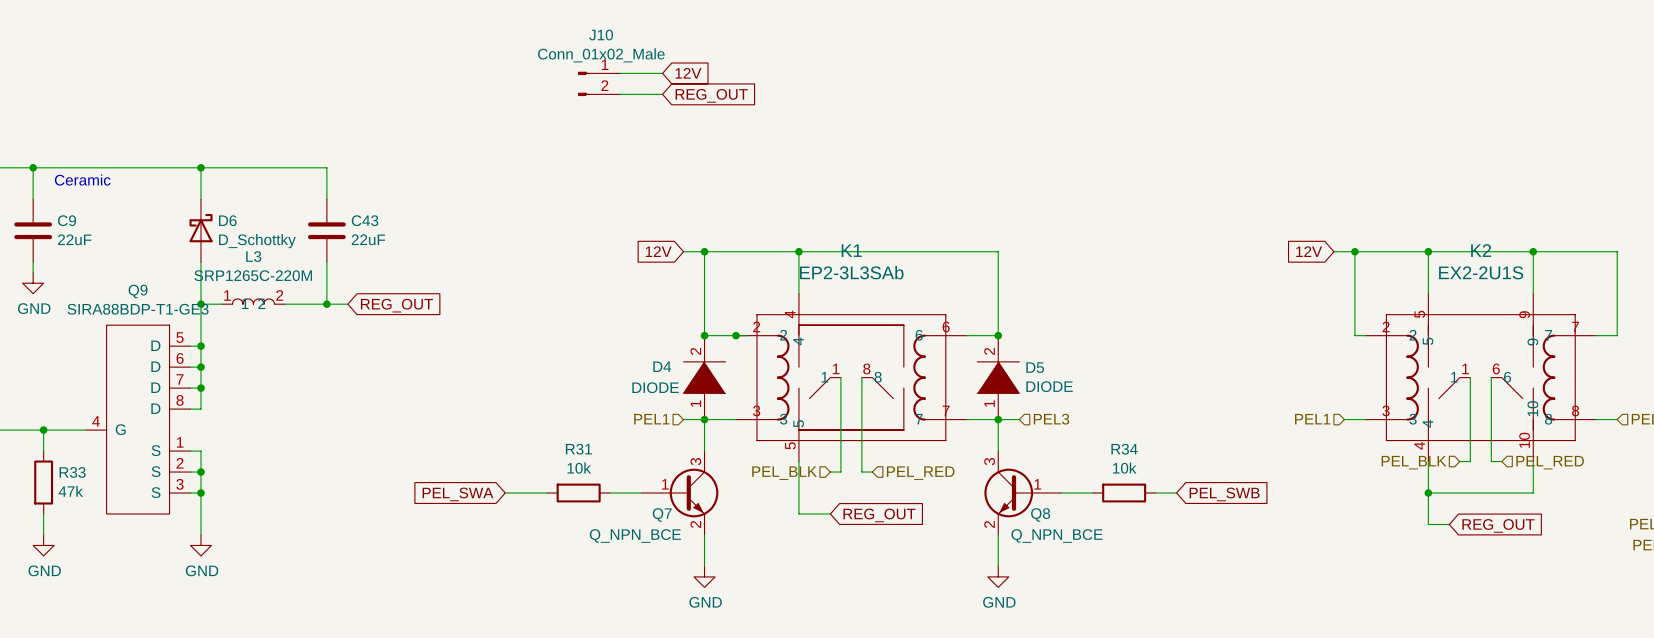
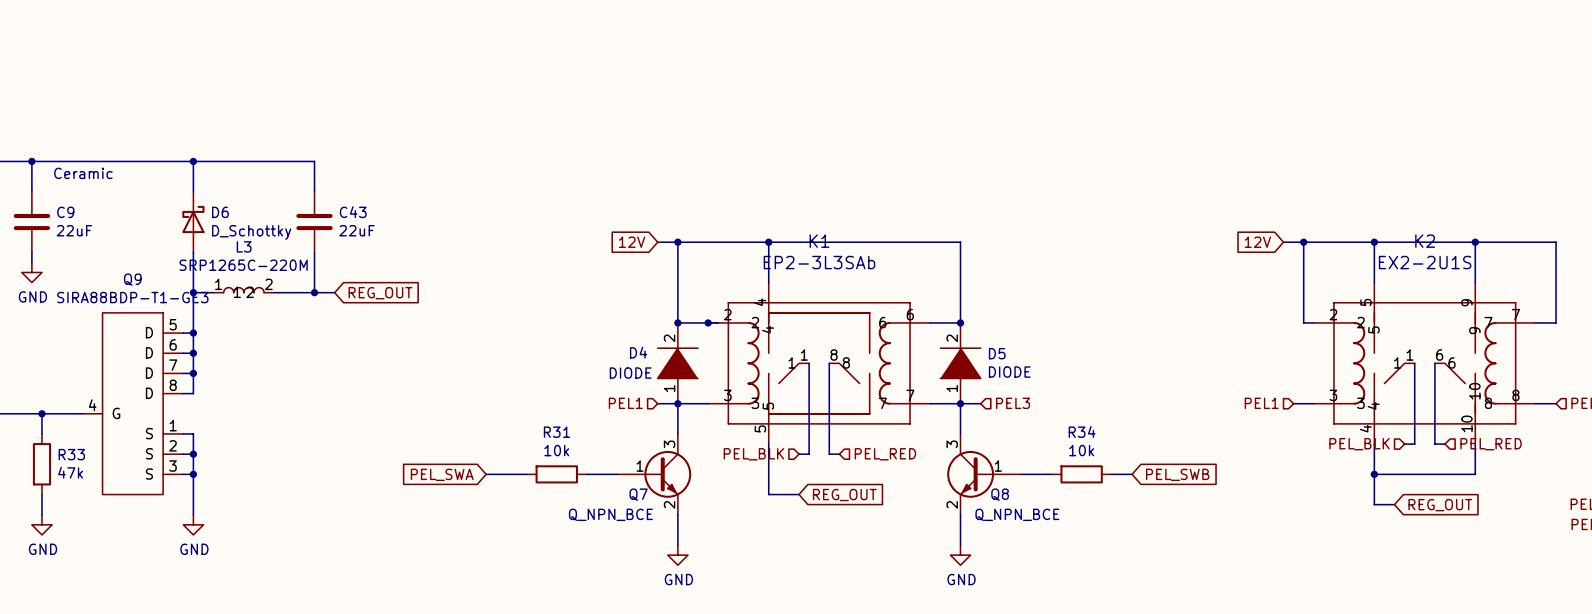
wire: (620, 73) (662, 73) -> none
global label: 12V (688, 73) -> none
J10: Conn_01x02_Male (599, 83) -> none
wire: (620, 94) (662, 94) -> none
global label: REG_OUT (711, 95) -> none

